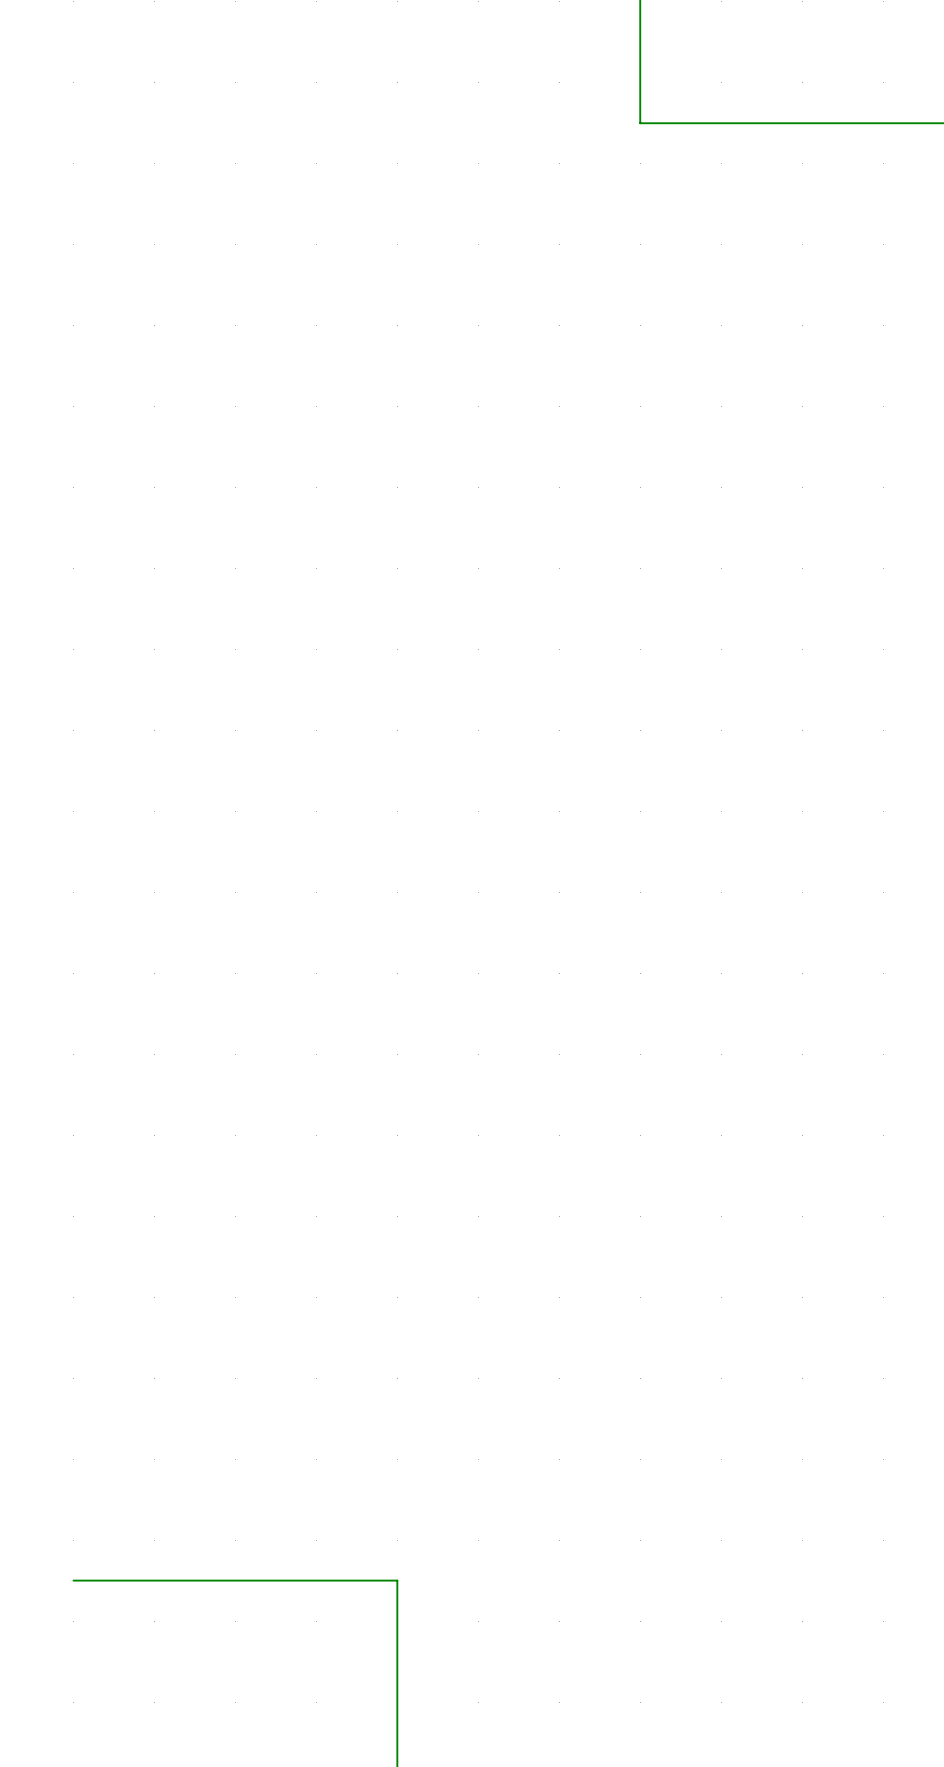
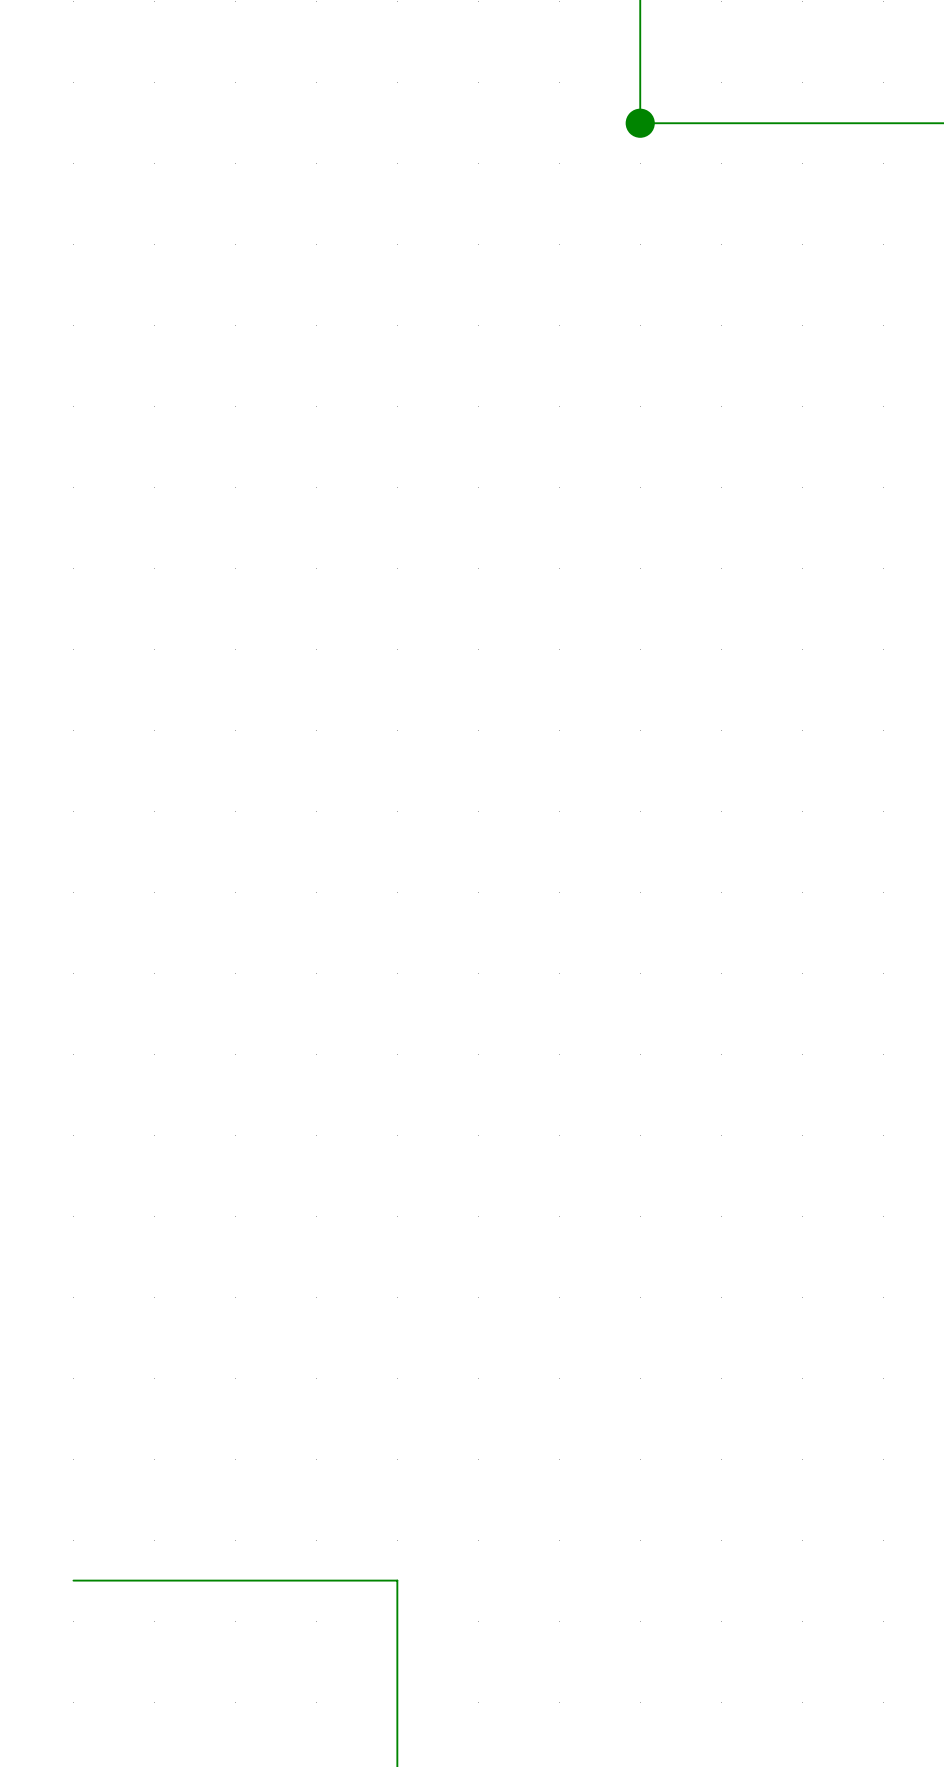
junction: none -> (640, 123)

